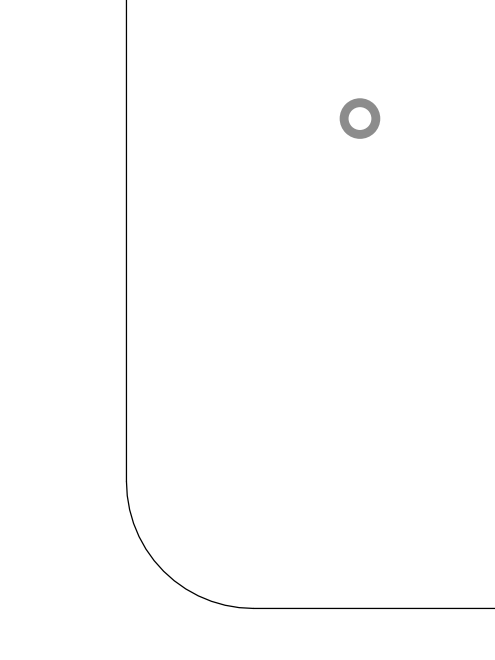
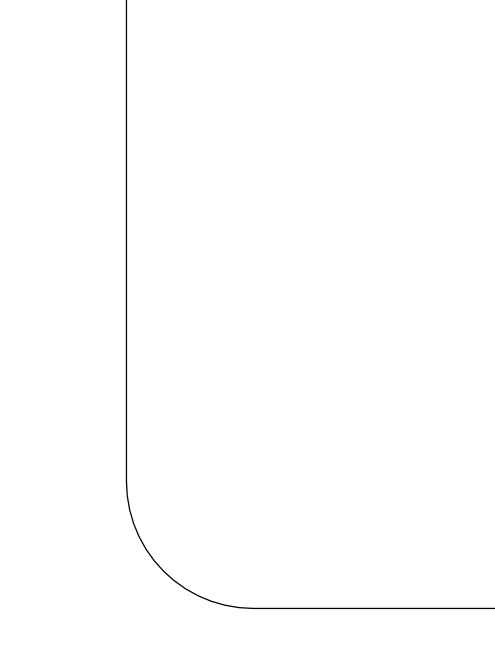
via: (359, 118) -> none

